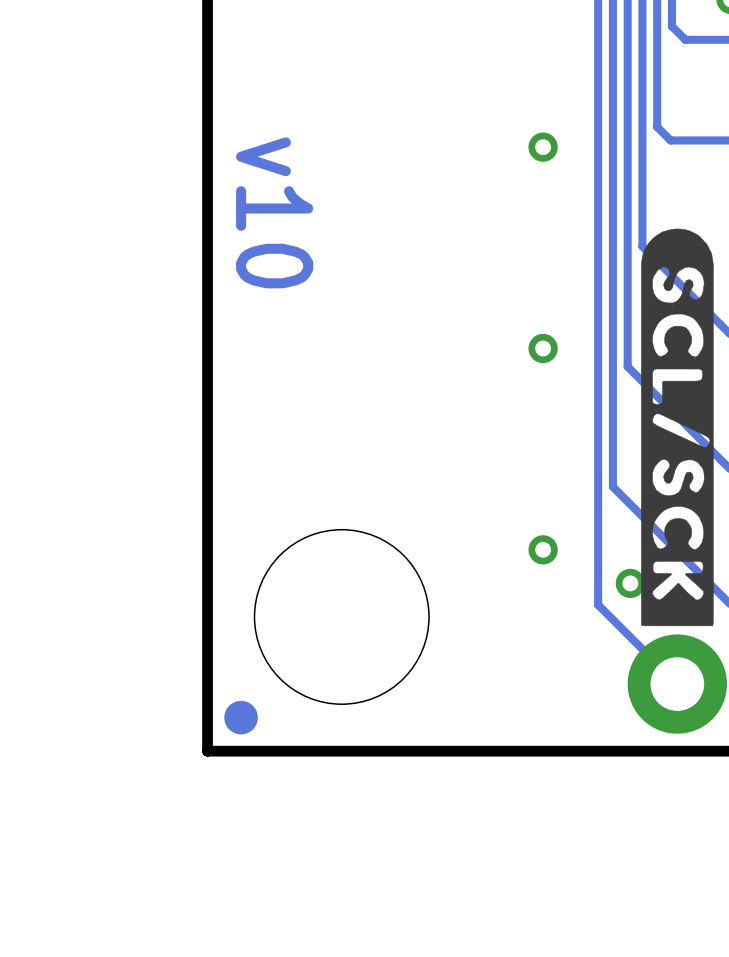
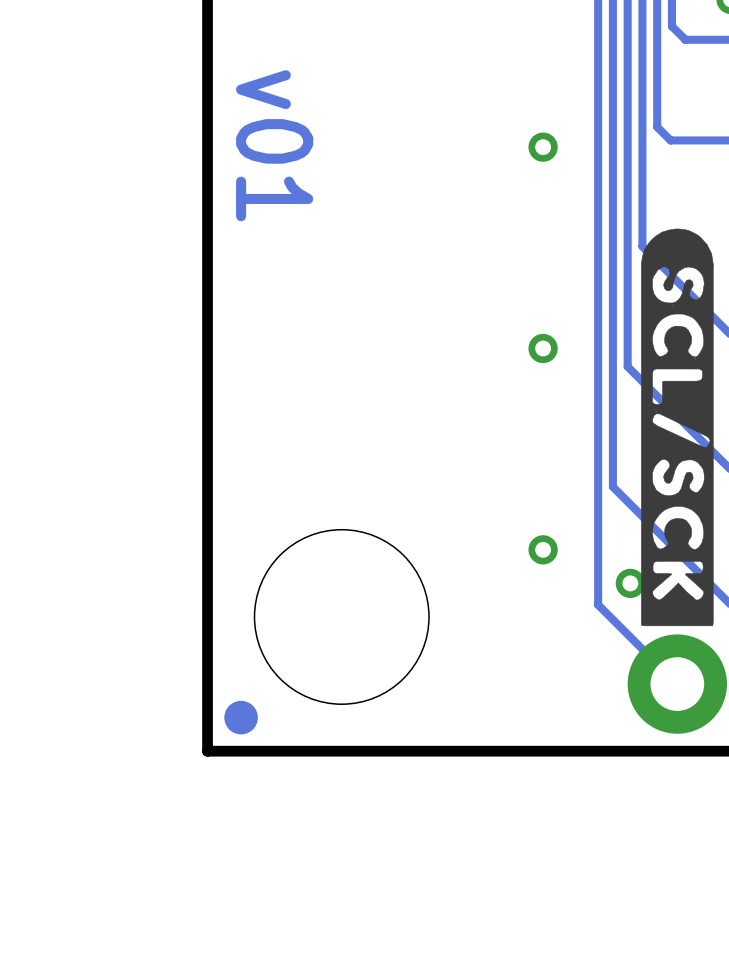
text: v10 (274, 212) -> v01 (274, 145)

